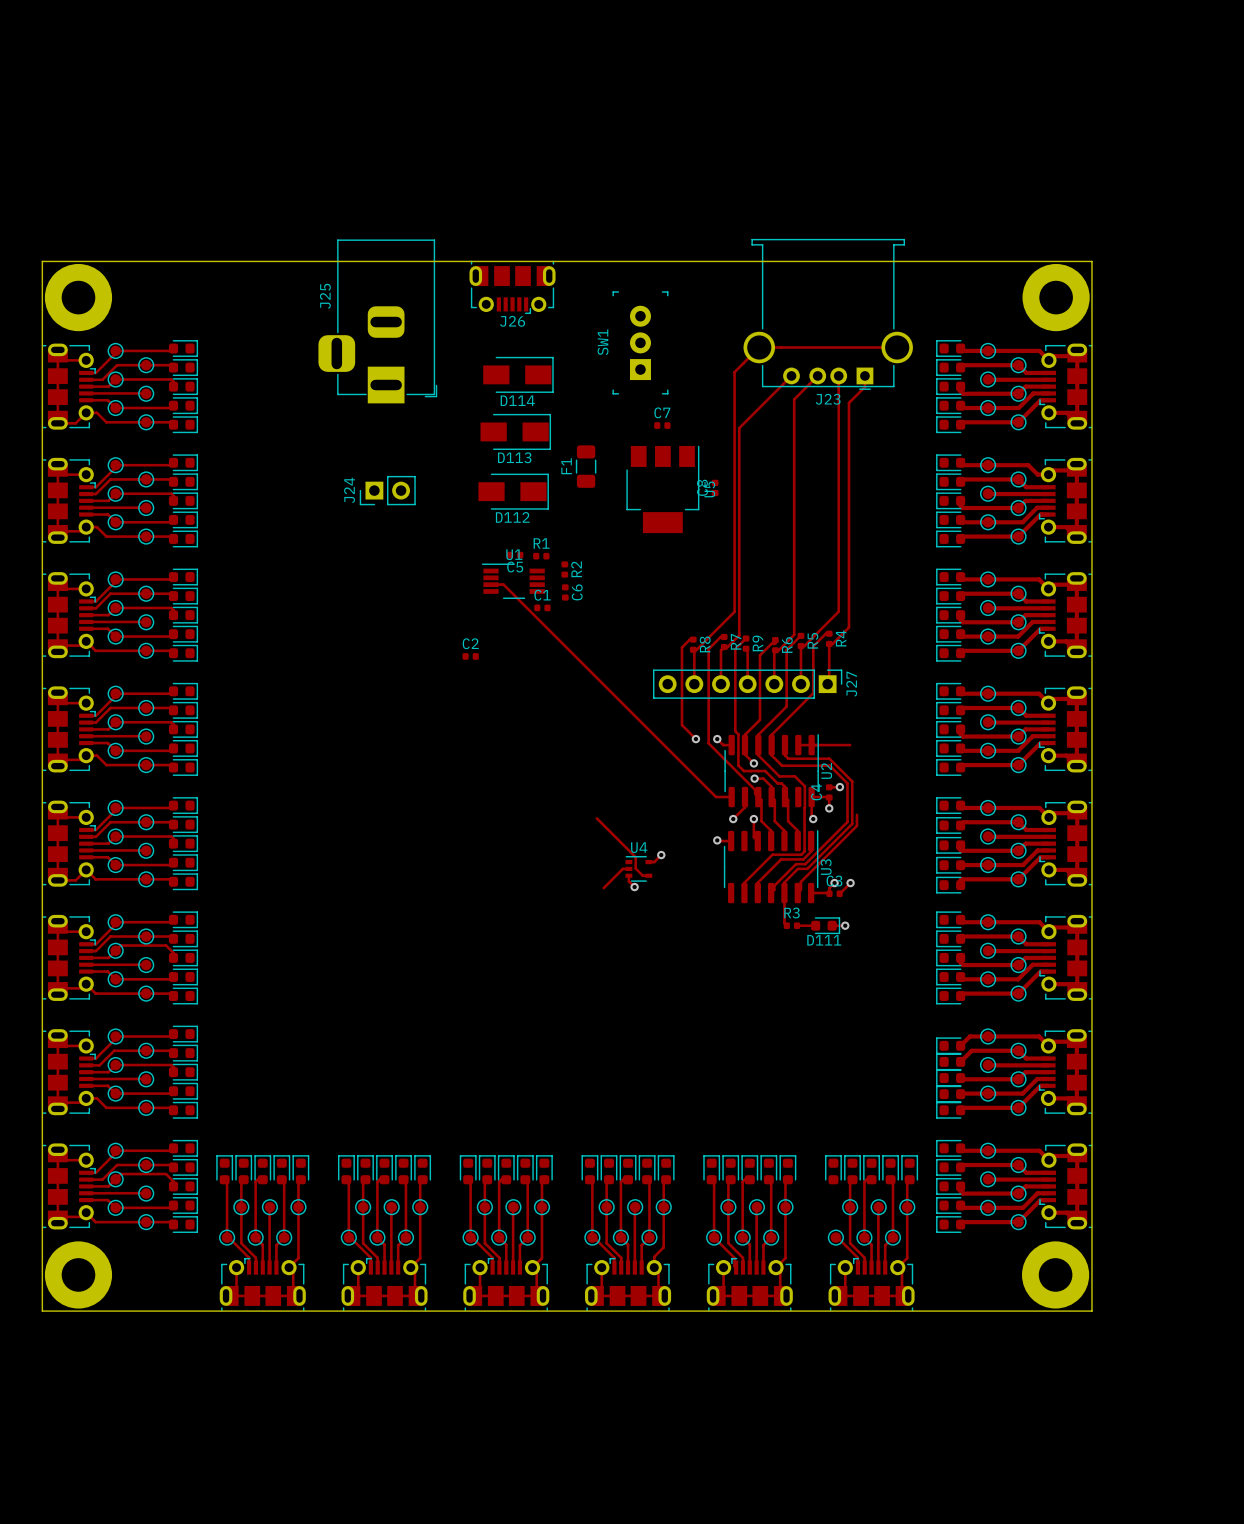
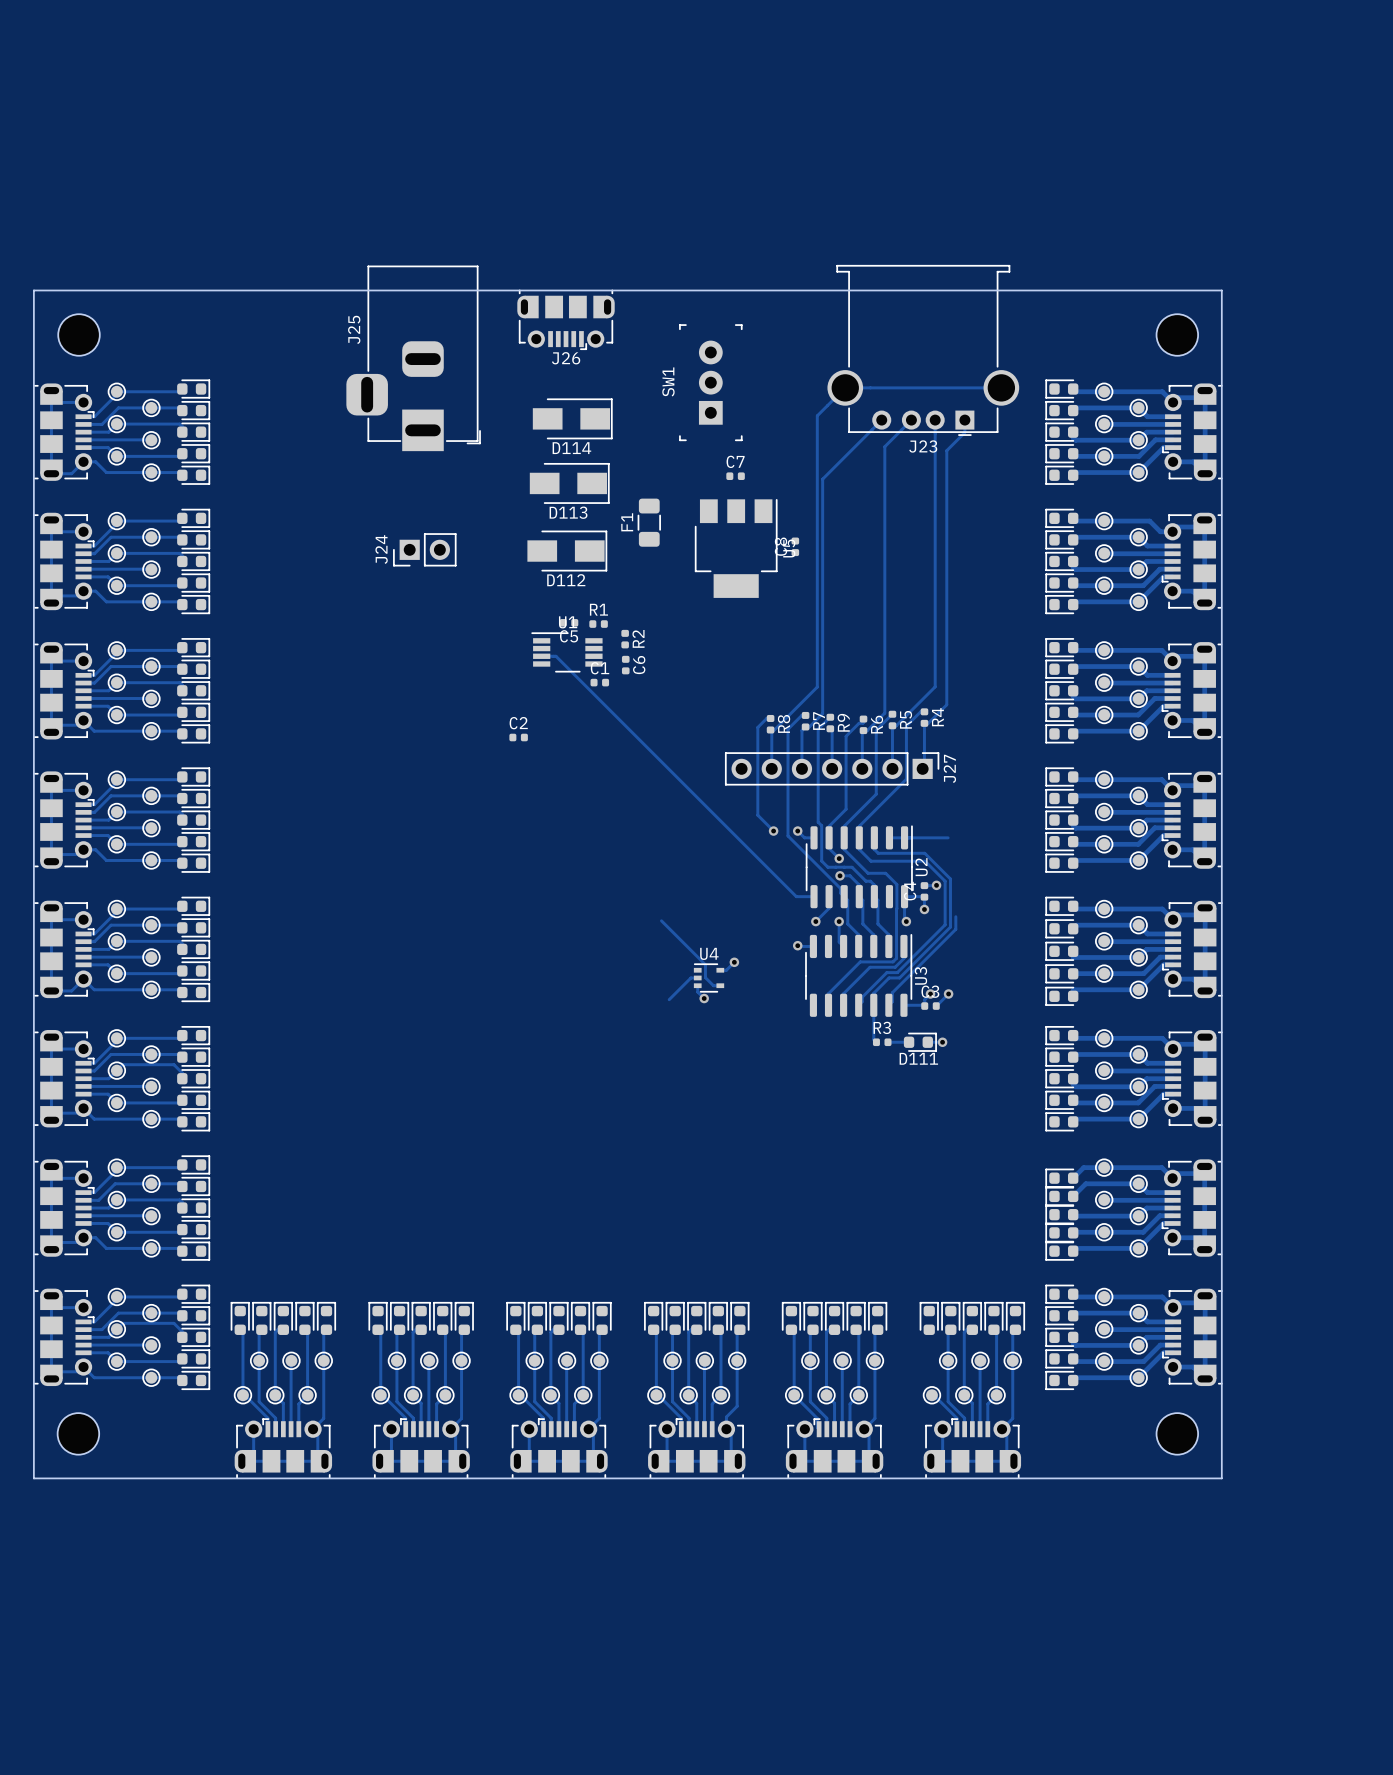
part footprint: [44, 263, 113, 332] -> [58, 314, 100, 356]
part footprint: [1022, 263, 1090, 332] -> [1156, 314, 1199, 356]
part footprint: [44, 1241, 113, 1309] -> [57, 1413, 100, 1455]
part footprint: [1022, 1241, 1090, 1309] -> [1156, 1413, 1199, 1455]

